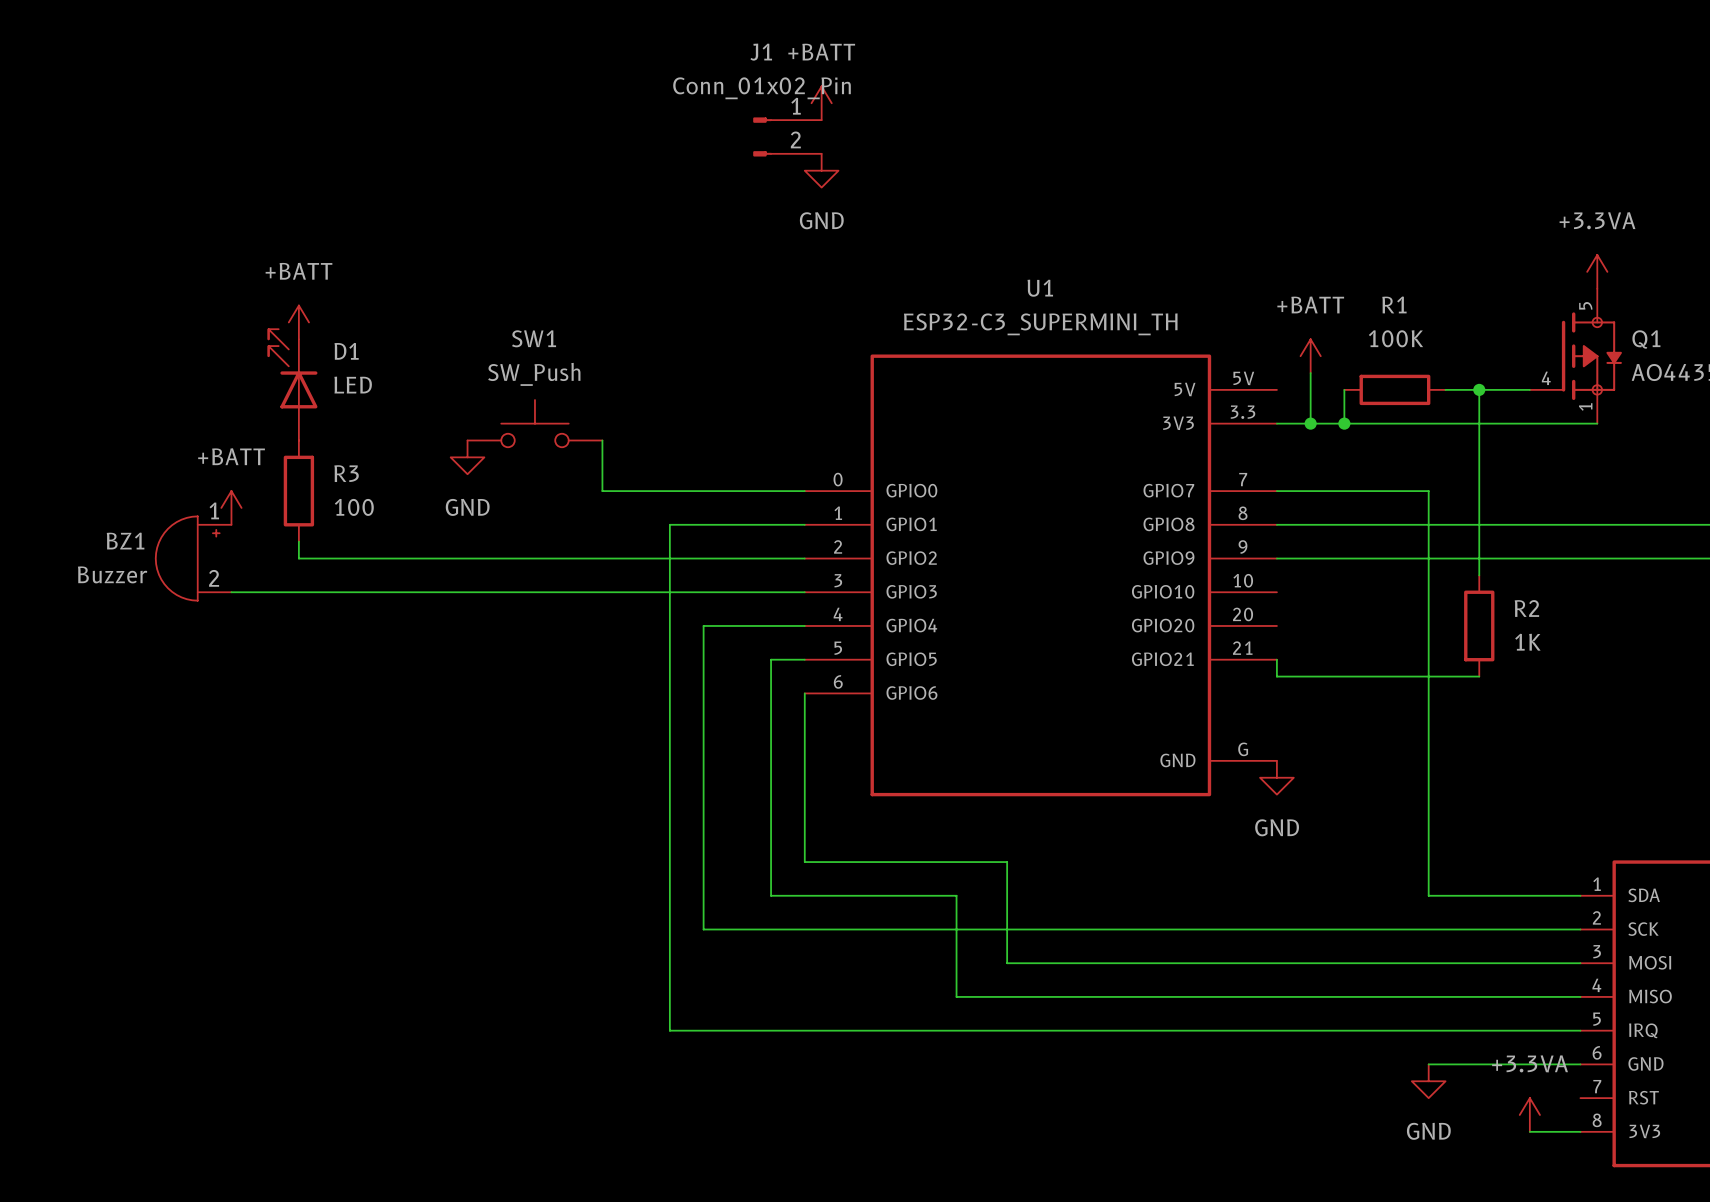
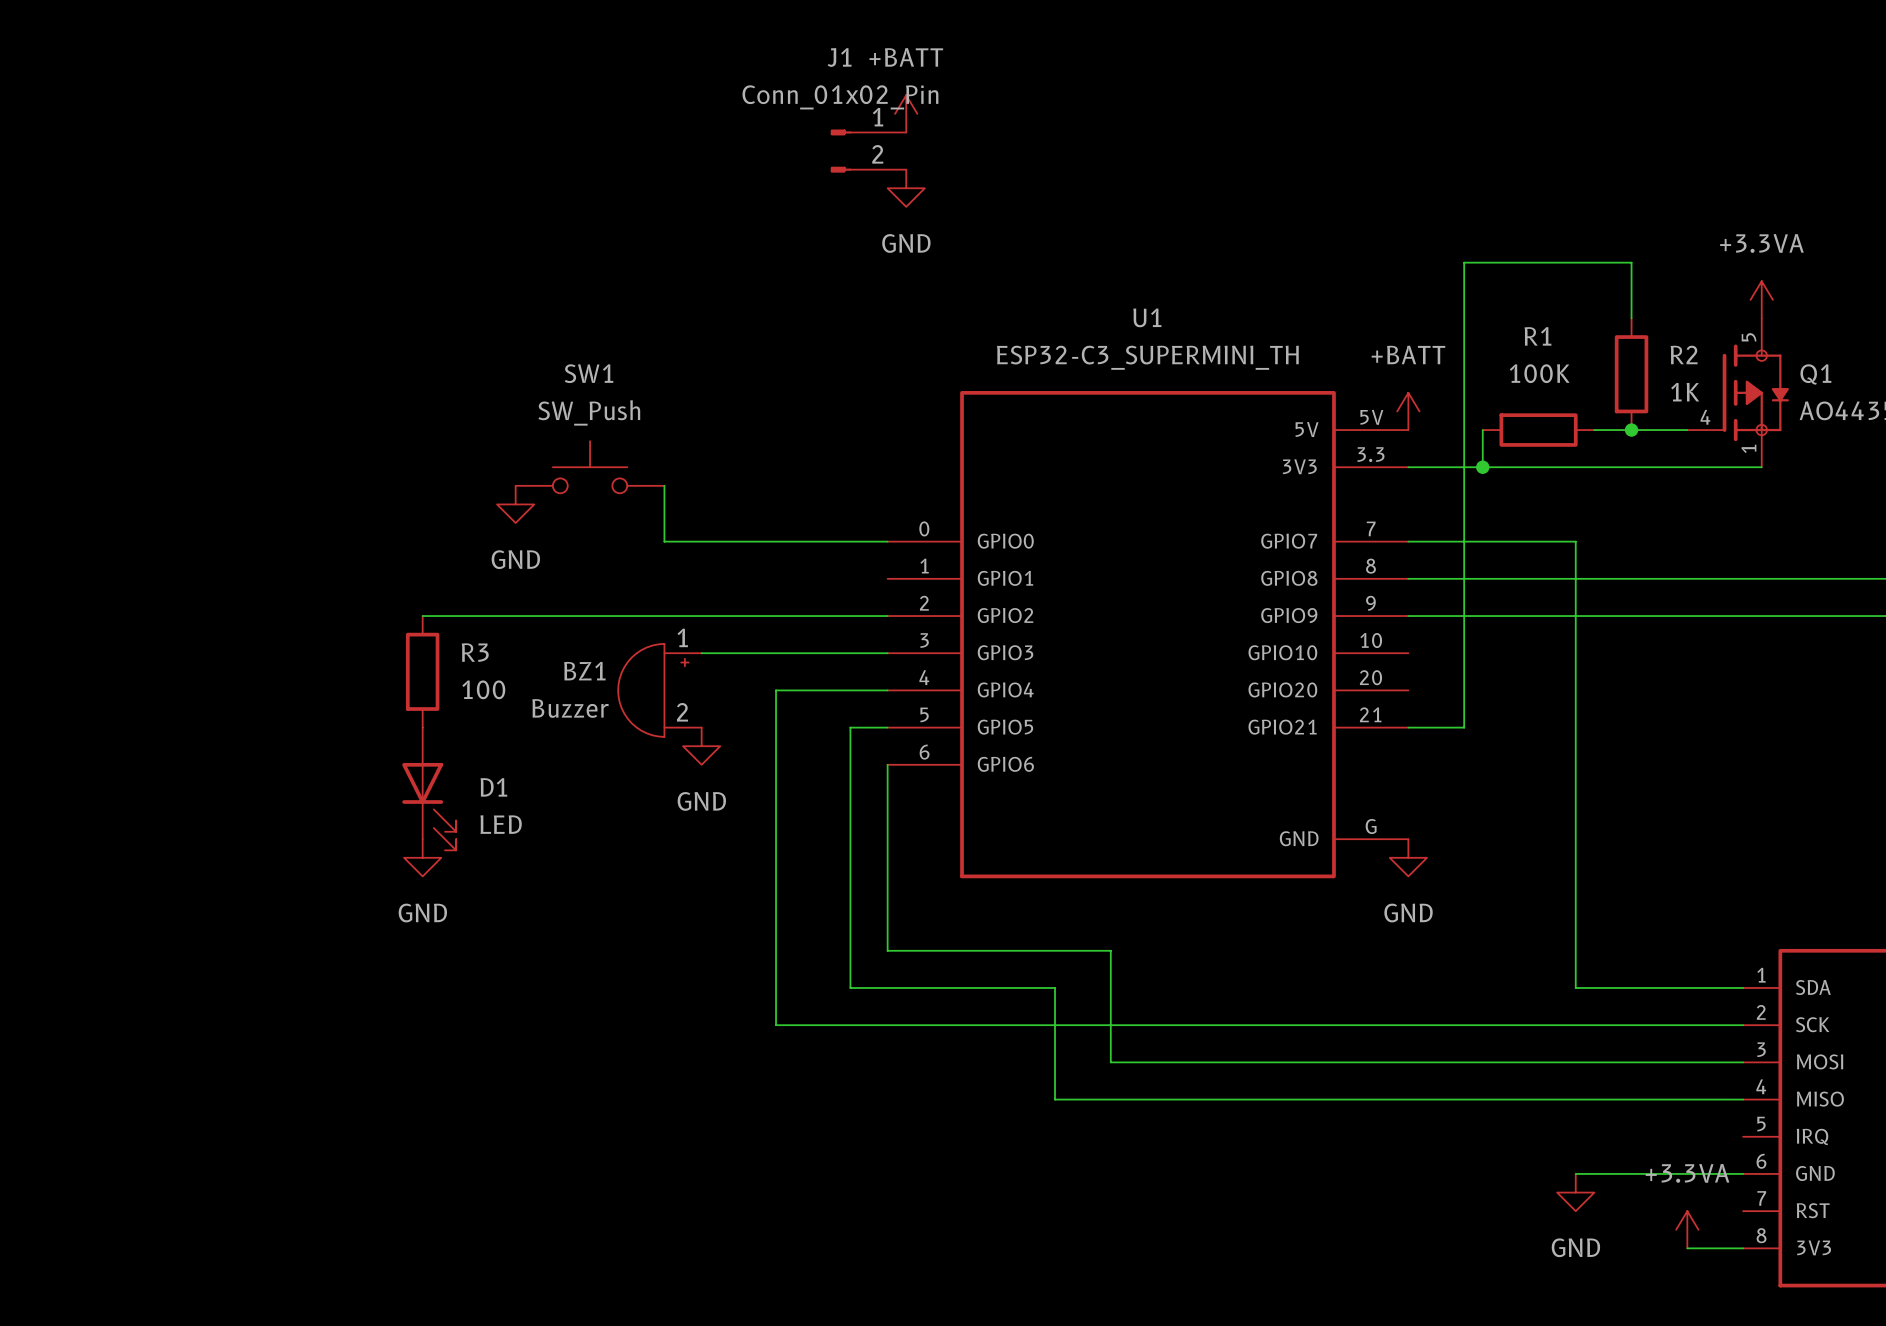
power symbol: +BATT (298, 322) -> none
D1 name position: D1 (346, 351) -> D1 (493, 787)
power symbol position: +BATT (1310, 356) -> +BATT (1408, 411)
D1 rotation: 0° (293, 368) -> 180° (429, 806)
wire: (1310, 373) (1310, 423) -> none
D1 position: (293, 384) -> (429, 788)
D1 value position: LED (353, 385) -> LED (501, 824)
wire: (1479, 389) (1479, 575) -> none
junction: (1310, 423) -> none
R3 position: (298, 491) -> (422, 671)
power symbol: +BATT (231, 507) -> none
wire: (804, 524) (669, 524) (669, 1030) (1580, 1030) -> none
wire: (298, 541) (298, 558) (383, 558) -> none
BZ1 position: (193, 558) -> (659, 690)
wire: (231, 592) (636, 592) -> none
R2 position: (1479, 625) -> (1631, 374)
wire: (1276, 659) (1276, 676) (1479, 676) -> (1408, 727) (1464, 727) (1464, 262) (1631, 262) (1631, 318)
power symbol: none -> GND (701, 746)
power symbol: none -> GND (422, 857)

